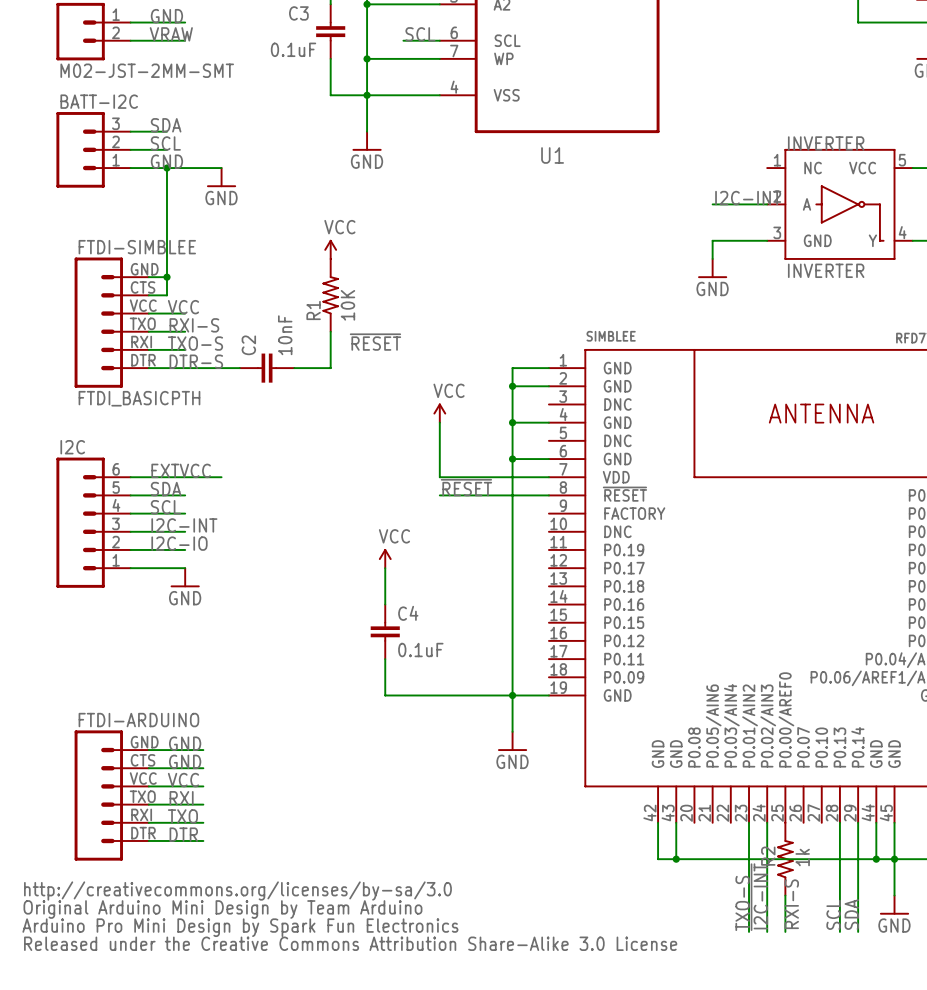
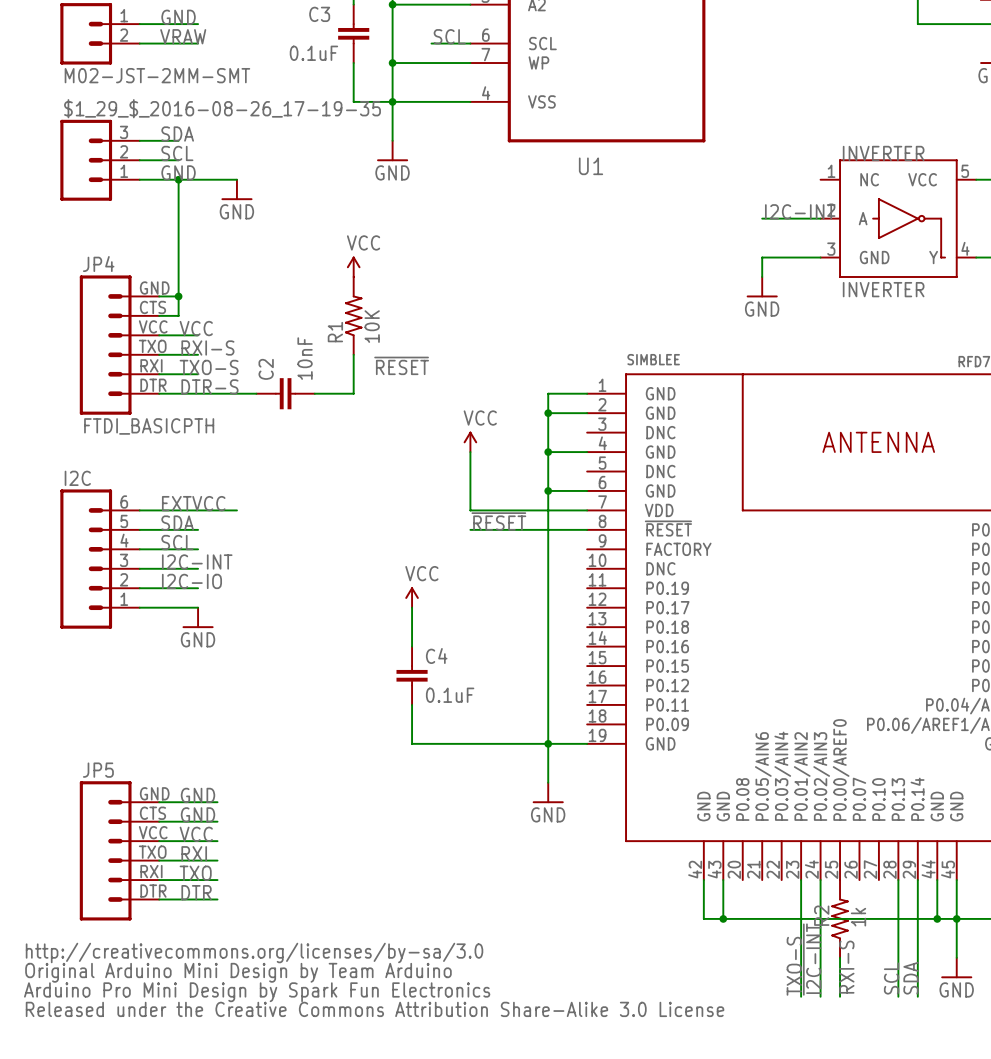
BATT-I2C name: BATT-I2C (99, 101) -> $1_29_$_2016-08-26_17-19-35 (222, 108)
FTDI-SIMBLEE name: FTDI-SIMBLEE (137, 247) -> JP4 (98, 264)
FTDI-ARDUINO name: FTDI-ARDUINO (138, 720) -> JP5 (98, 770)

